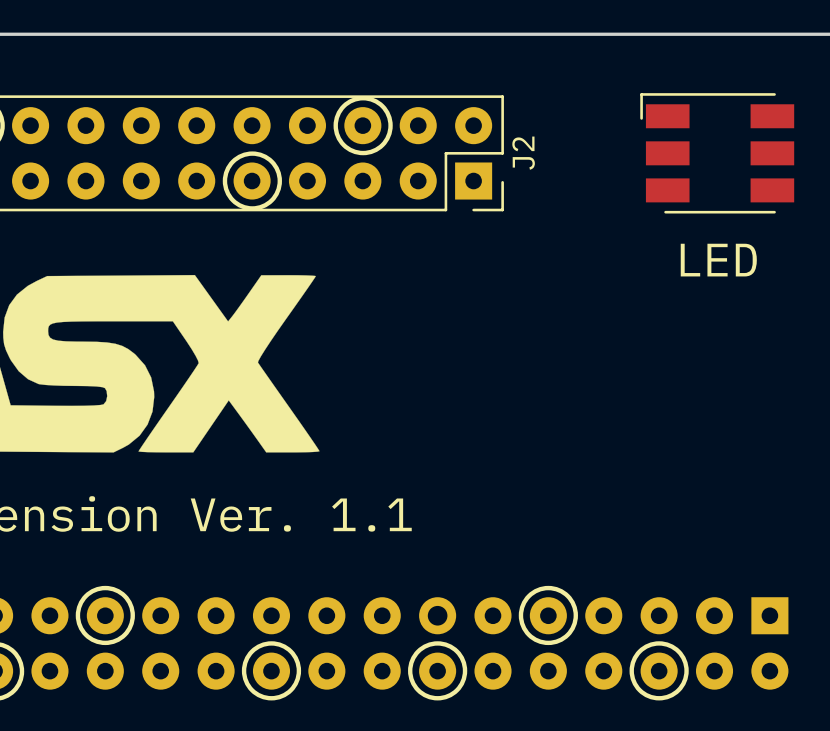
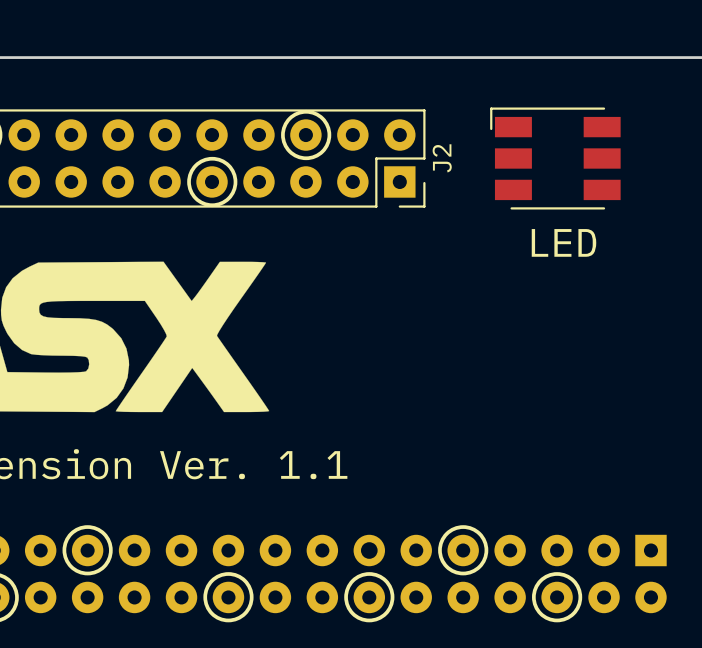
part position: (717, 153) -> (555, 158)
text position: LED (718, 260) -> LED (563, 242)

